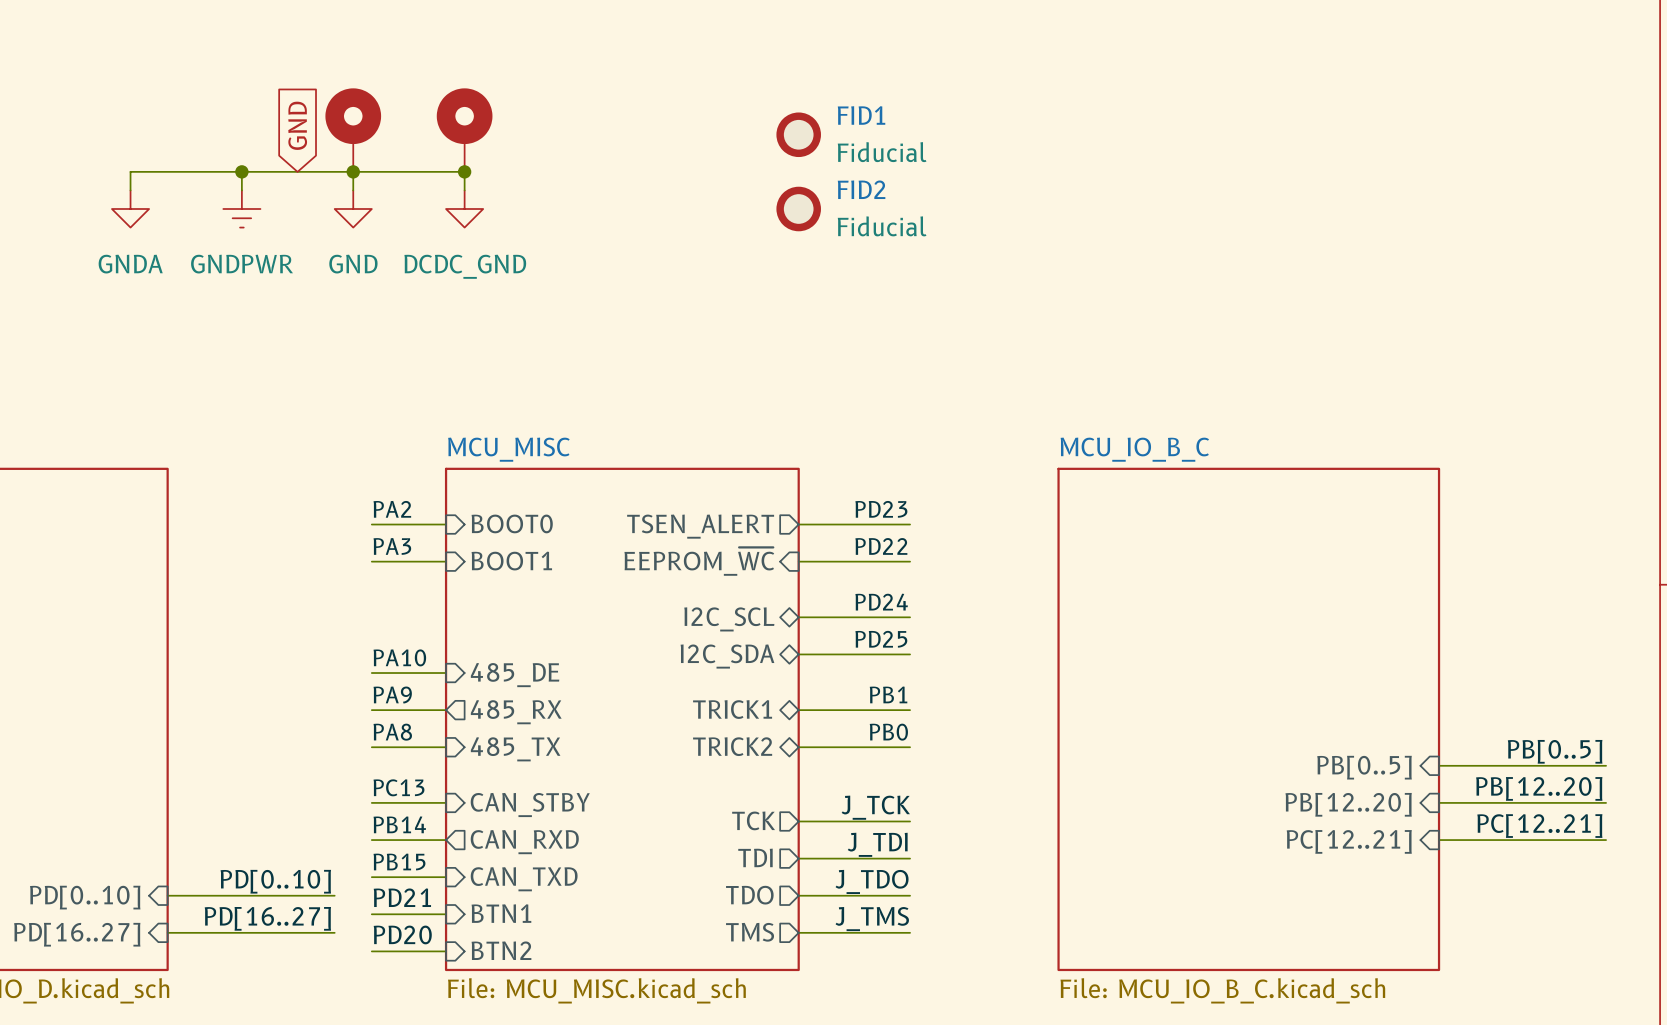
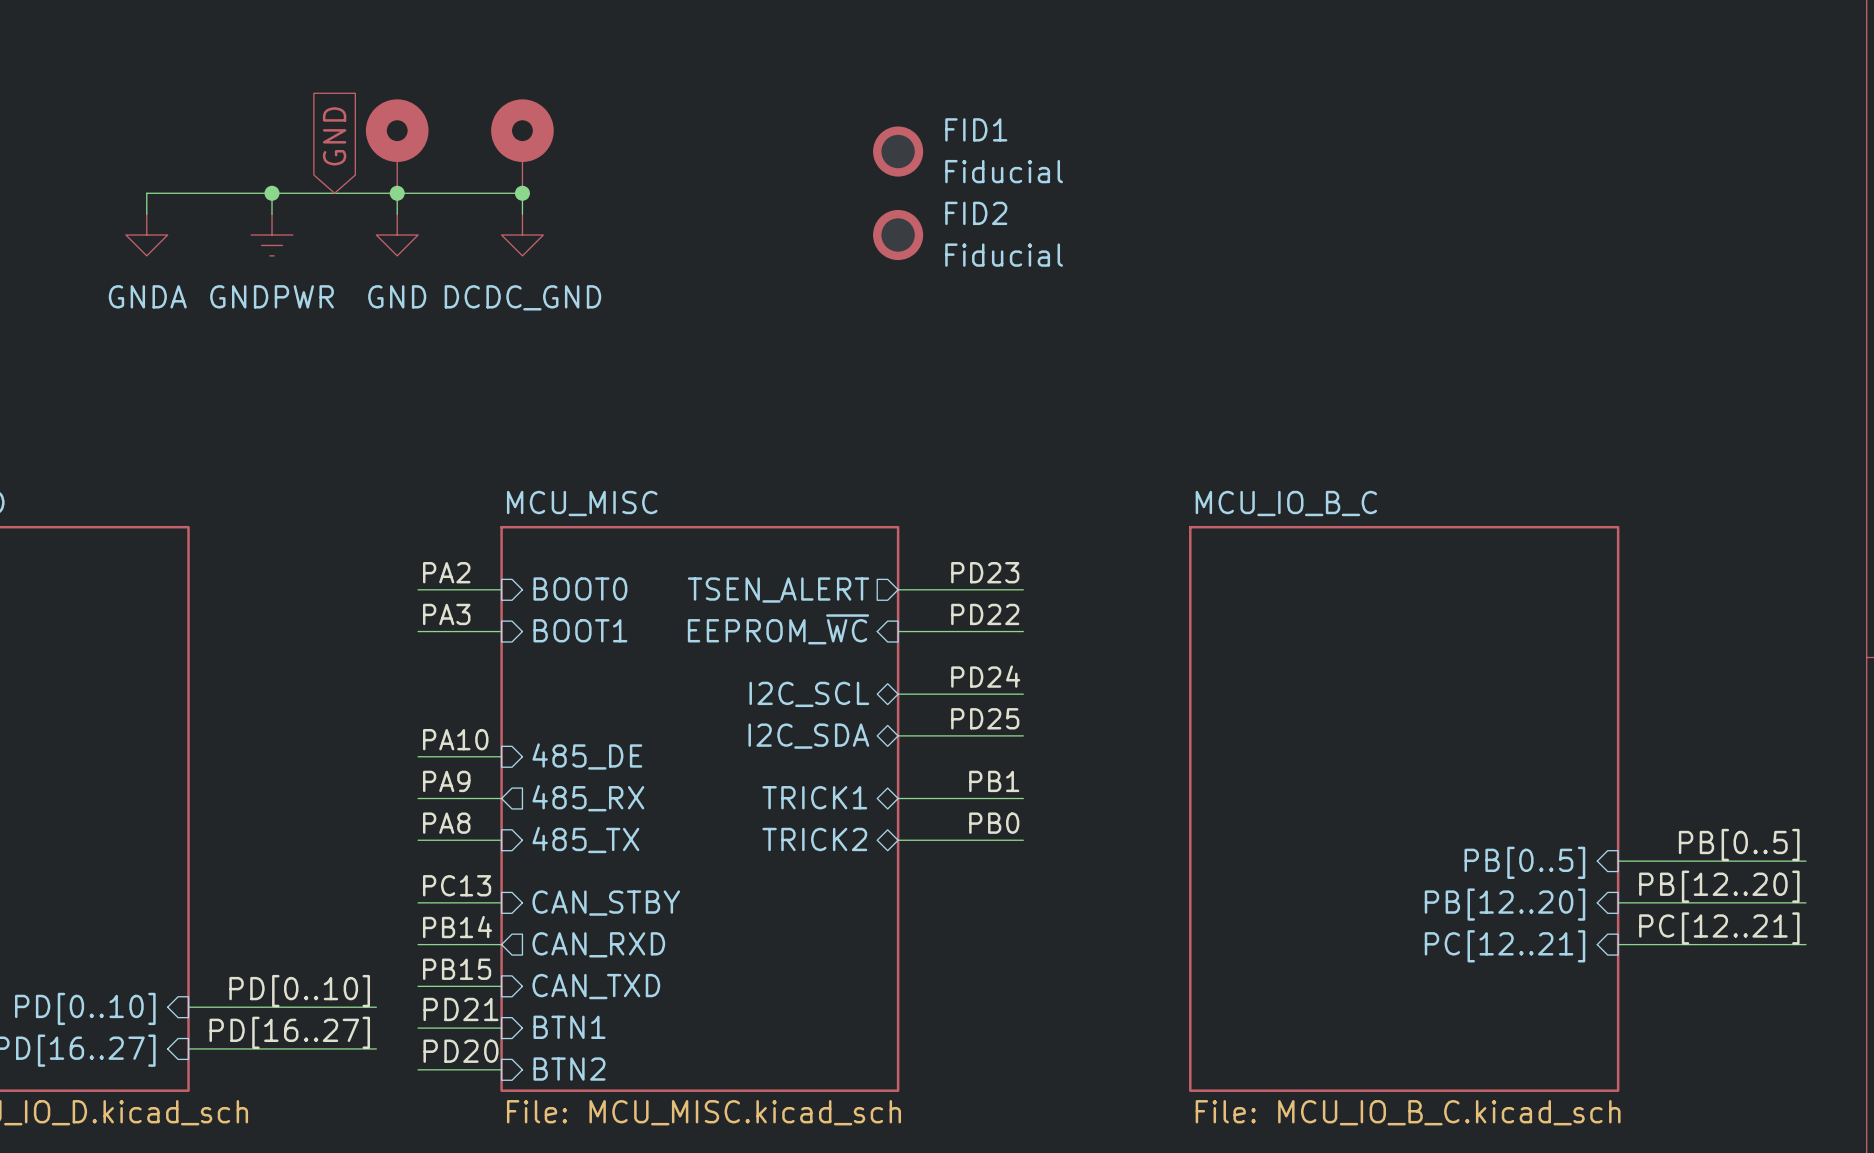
label: J_TCK (875, 807) -> none
sheet pin: TCK (753, 820) -> none
wire: (798, 821) (910, 821) -> none
label: J_TDI (877, 844) -> none
sheet pin: TDI (755, 857) -> none
wire: (798, 858) (910, 858) -> none
label: J_TDO (872, 881) -> none
sheet pin: TDO (749, 895) -> none
wire: (798, 895) (910, 895) -> none
label: J_TMS (872, 919) -> none
sheet pin: TMS (750, 932) -> none
wire: (798, 932) (910, 932) -> none

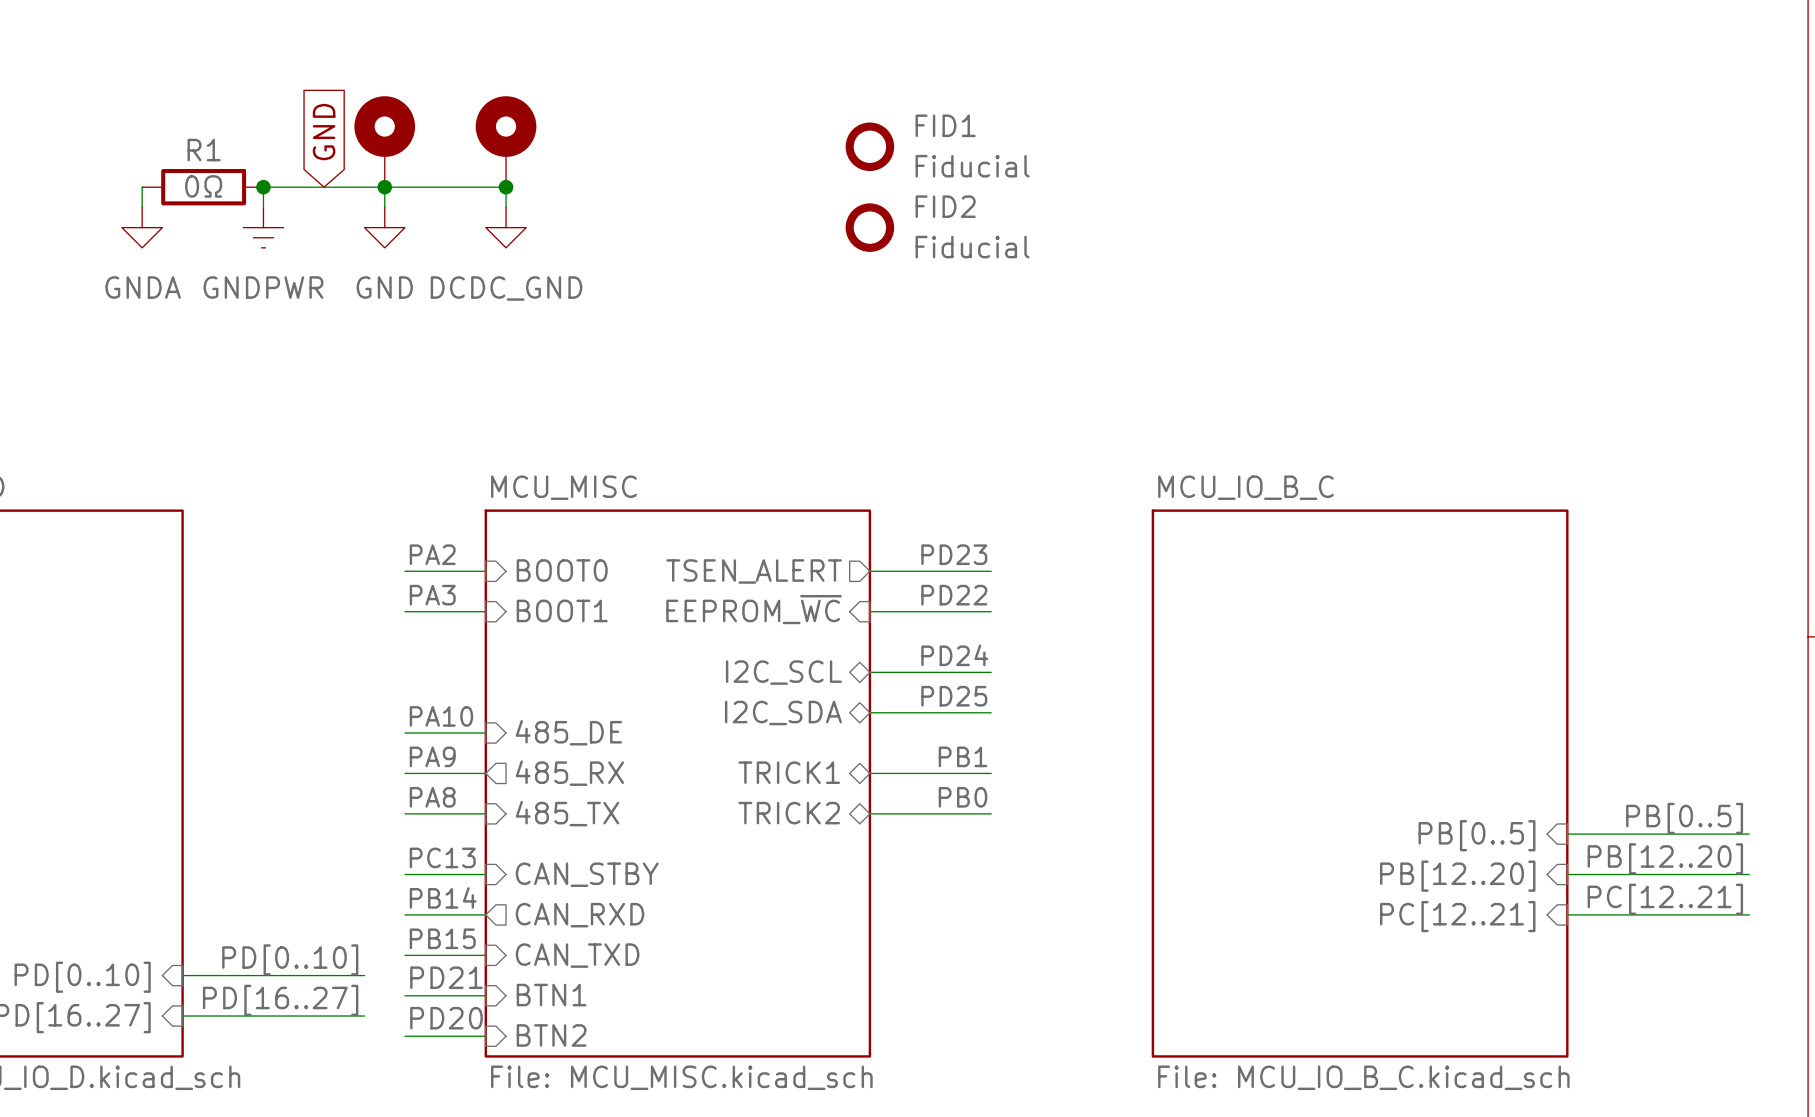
wire: (147, 193) (272, 193) -> none
R1: none -> 0Ω (203, 187)

